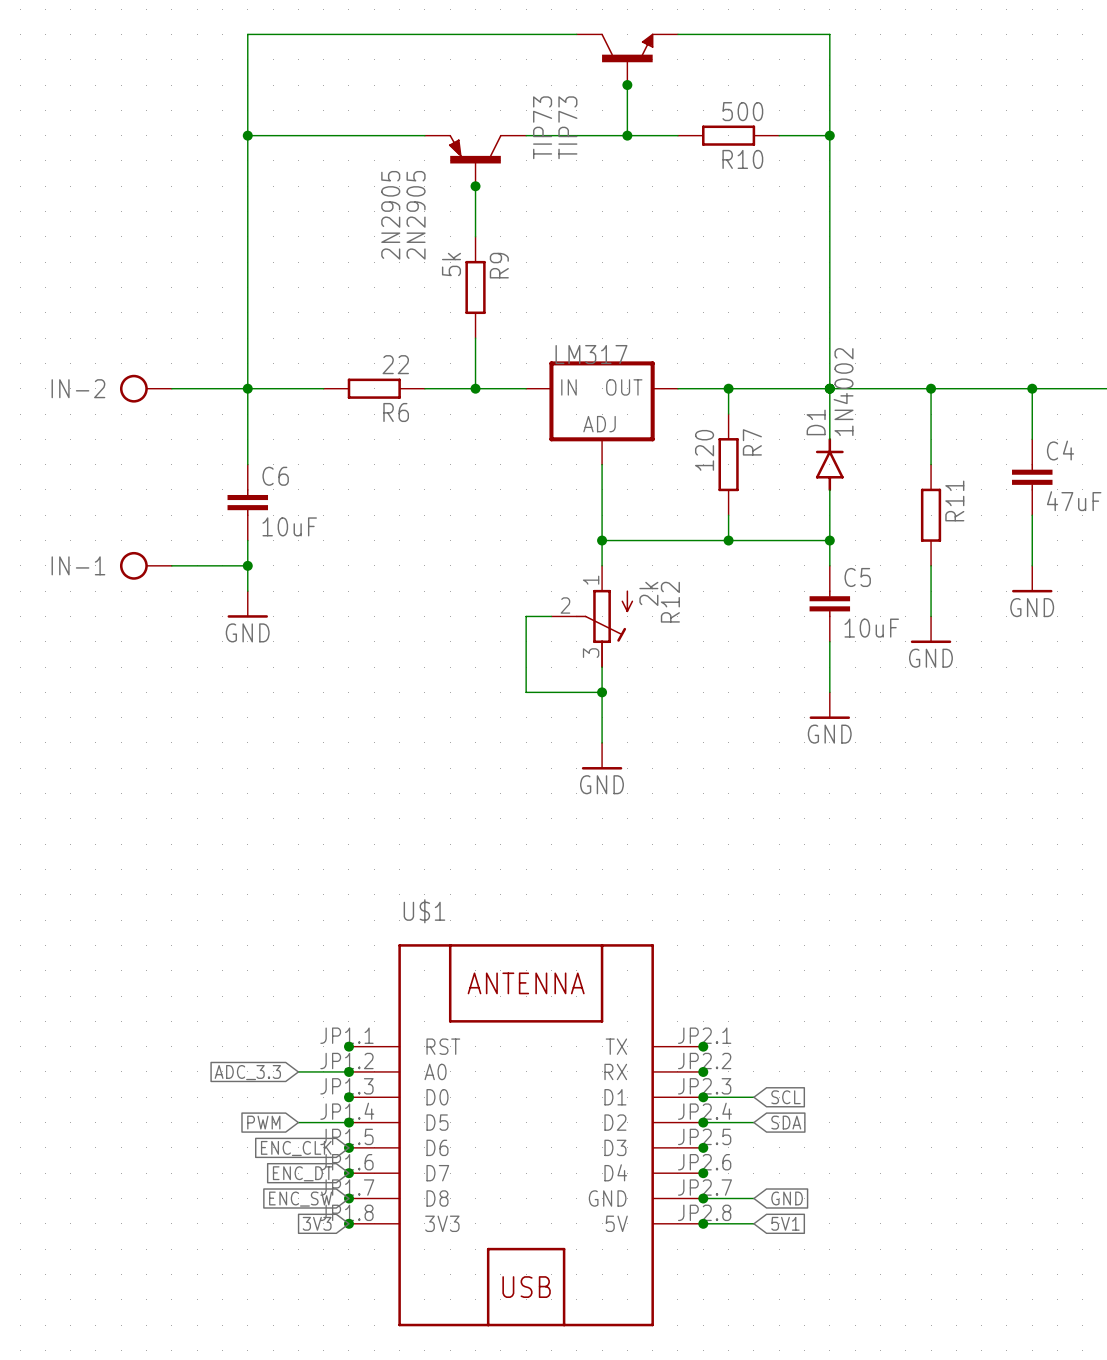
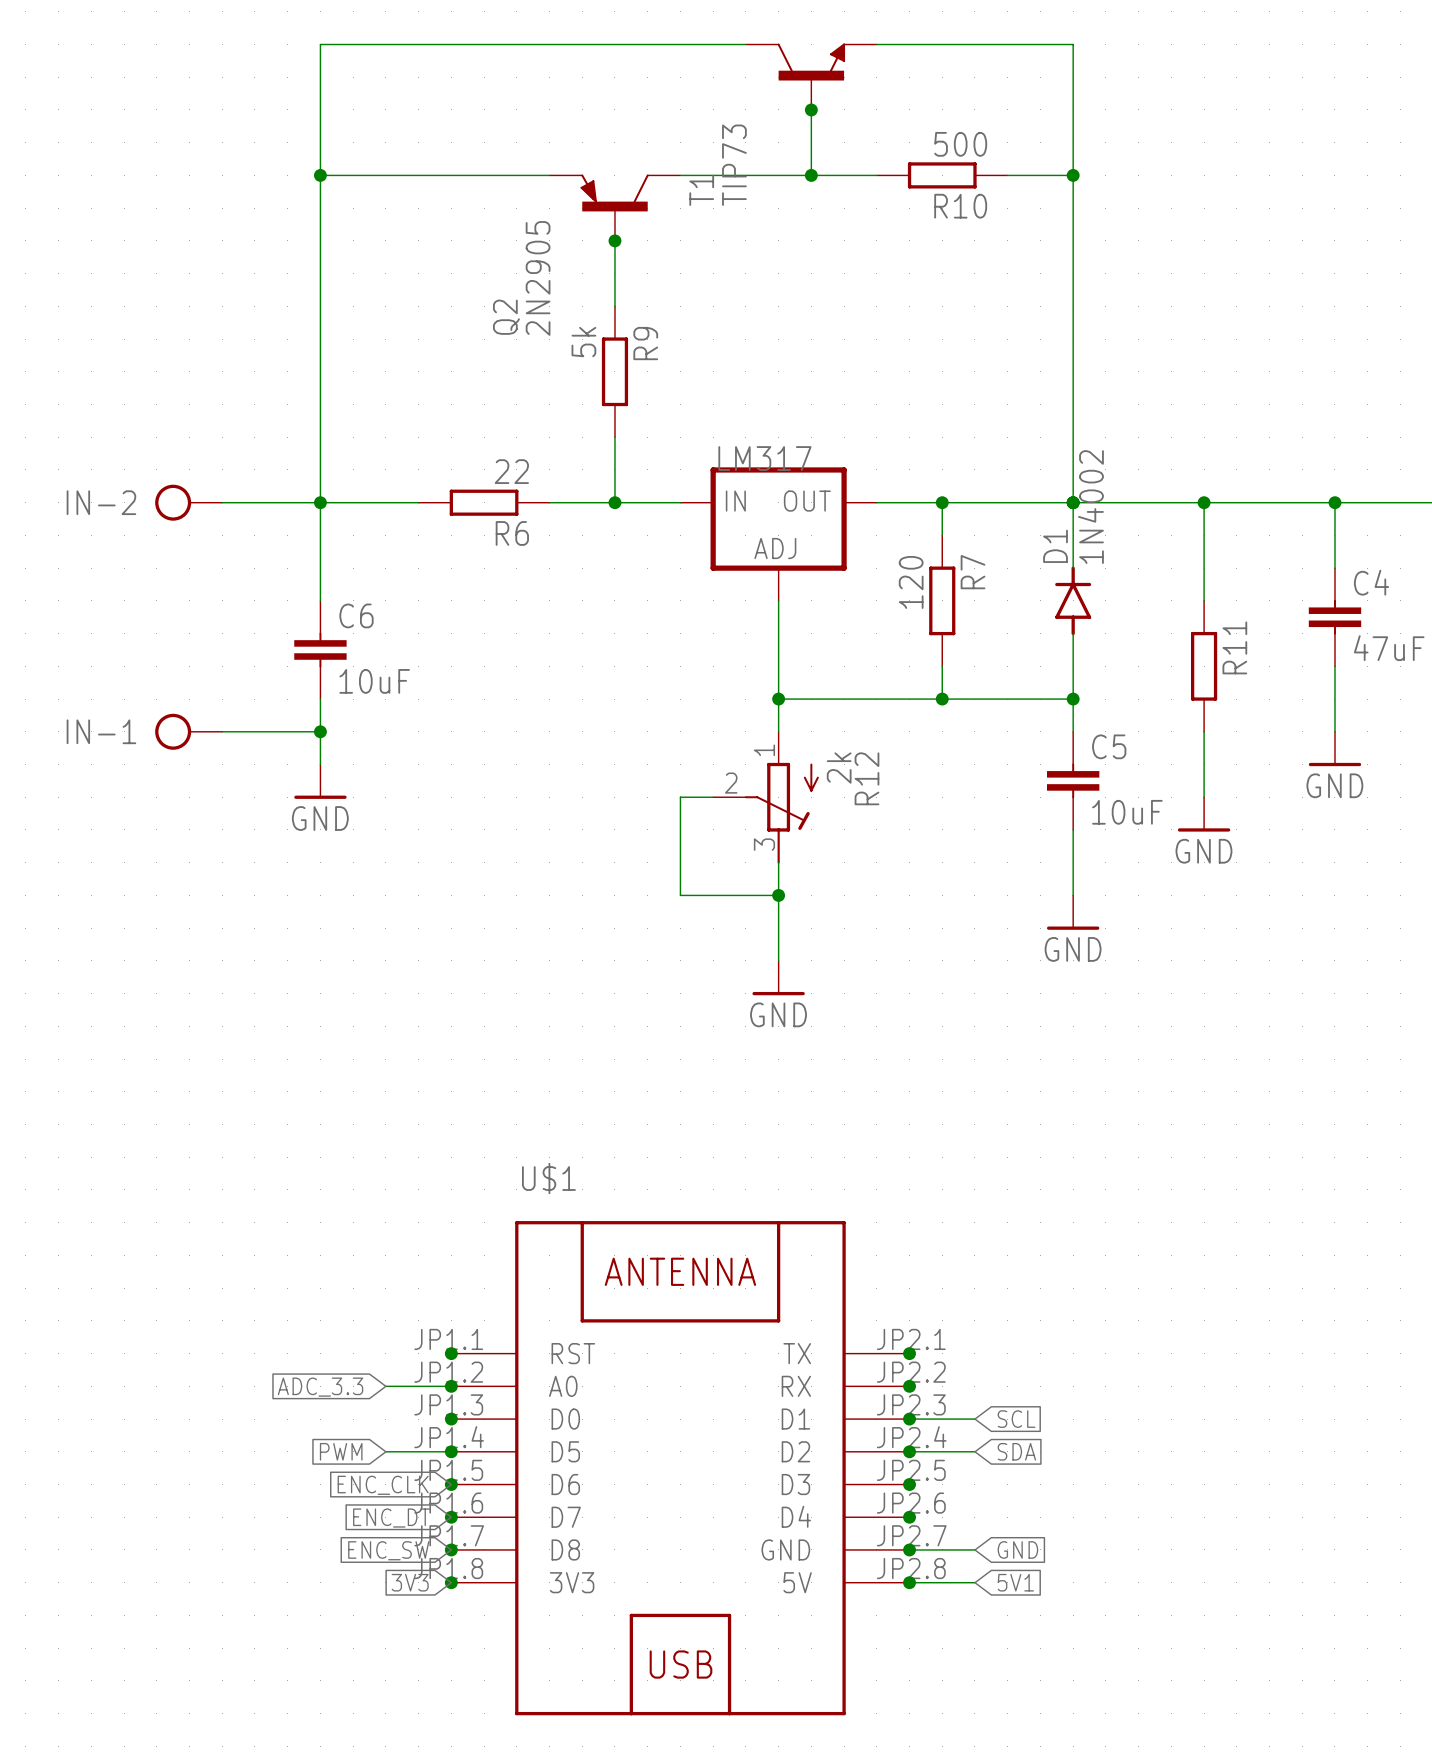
TIP73 name: TIP73 (542, 127) -> T1 (701, 190)
2N2905 name: 2N2905 (390, 215) -> Q2 (506, 317)

